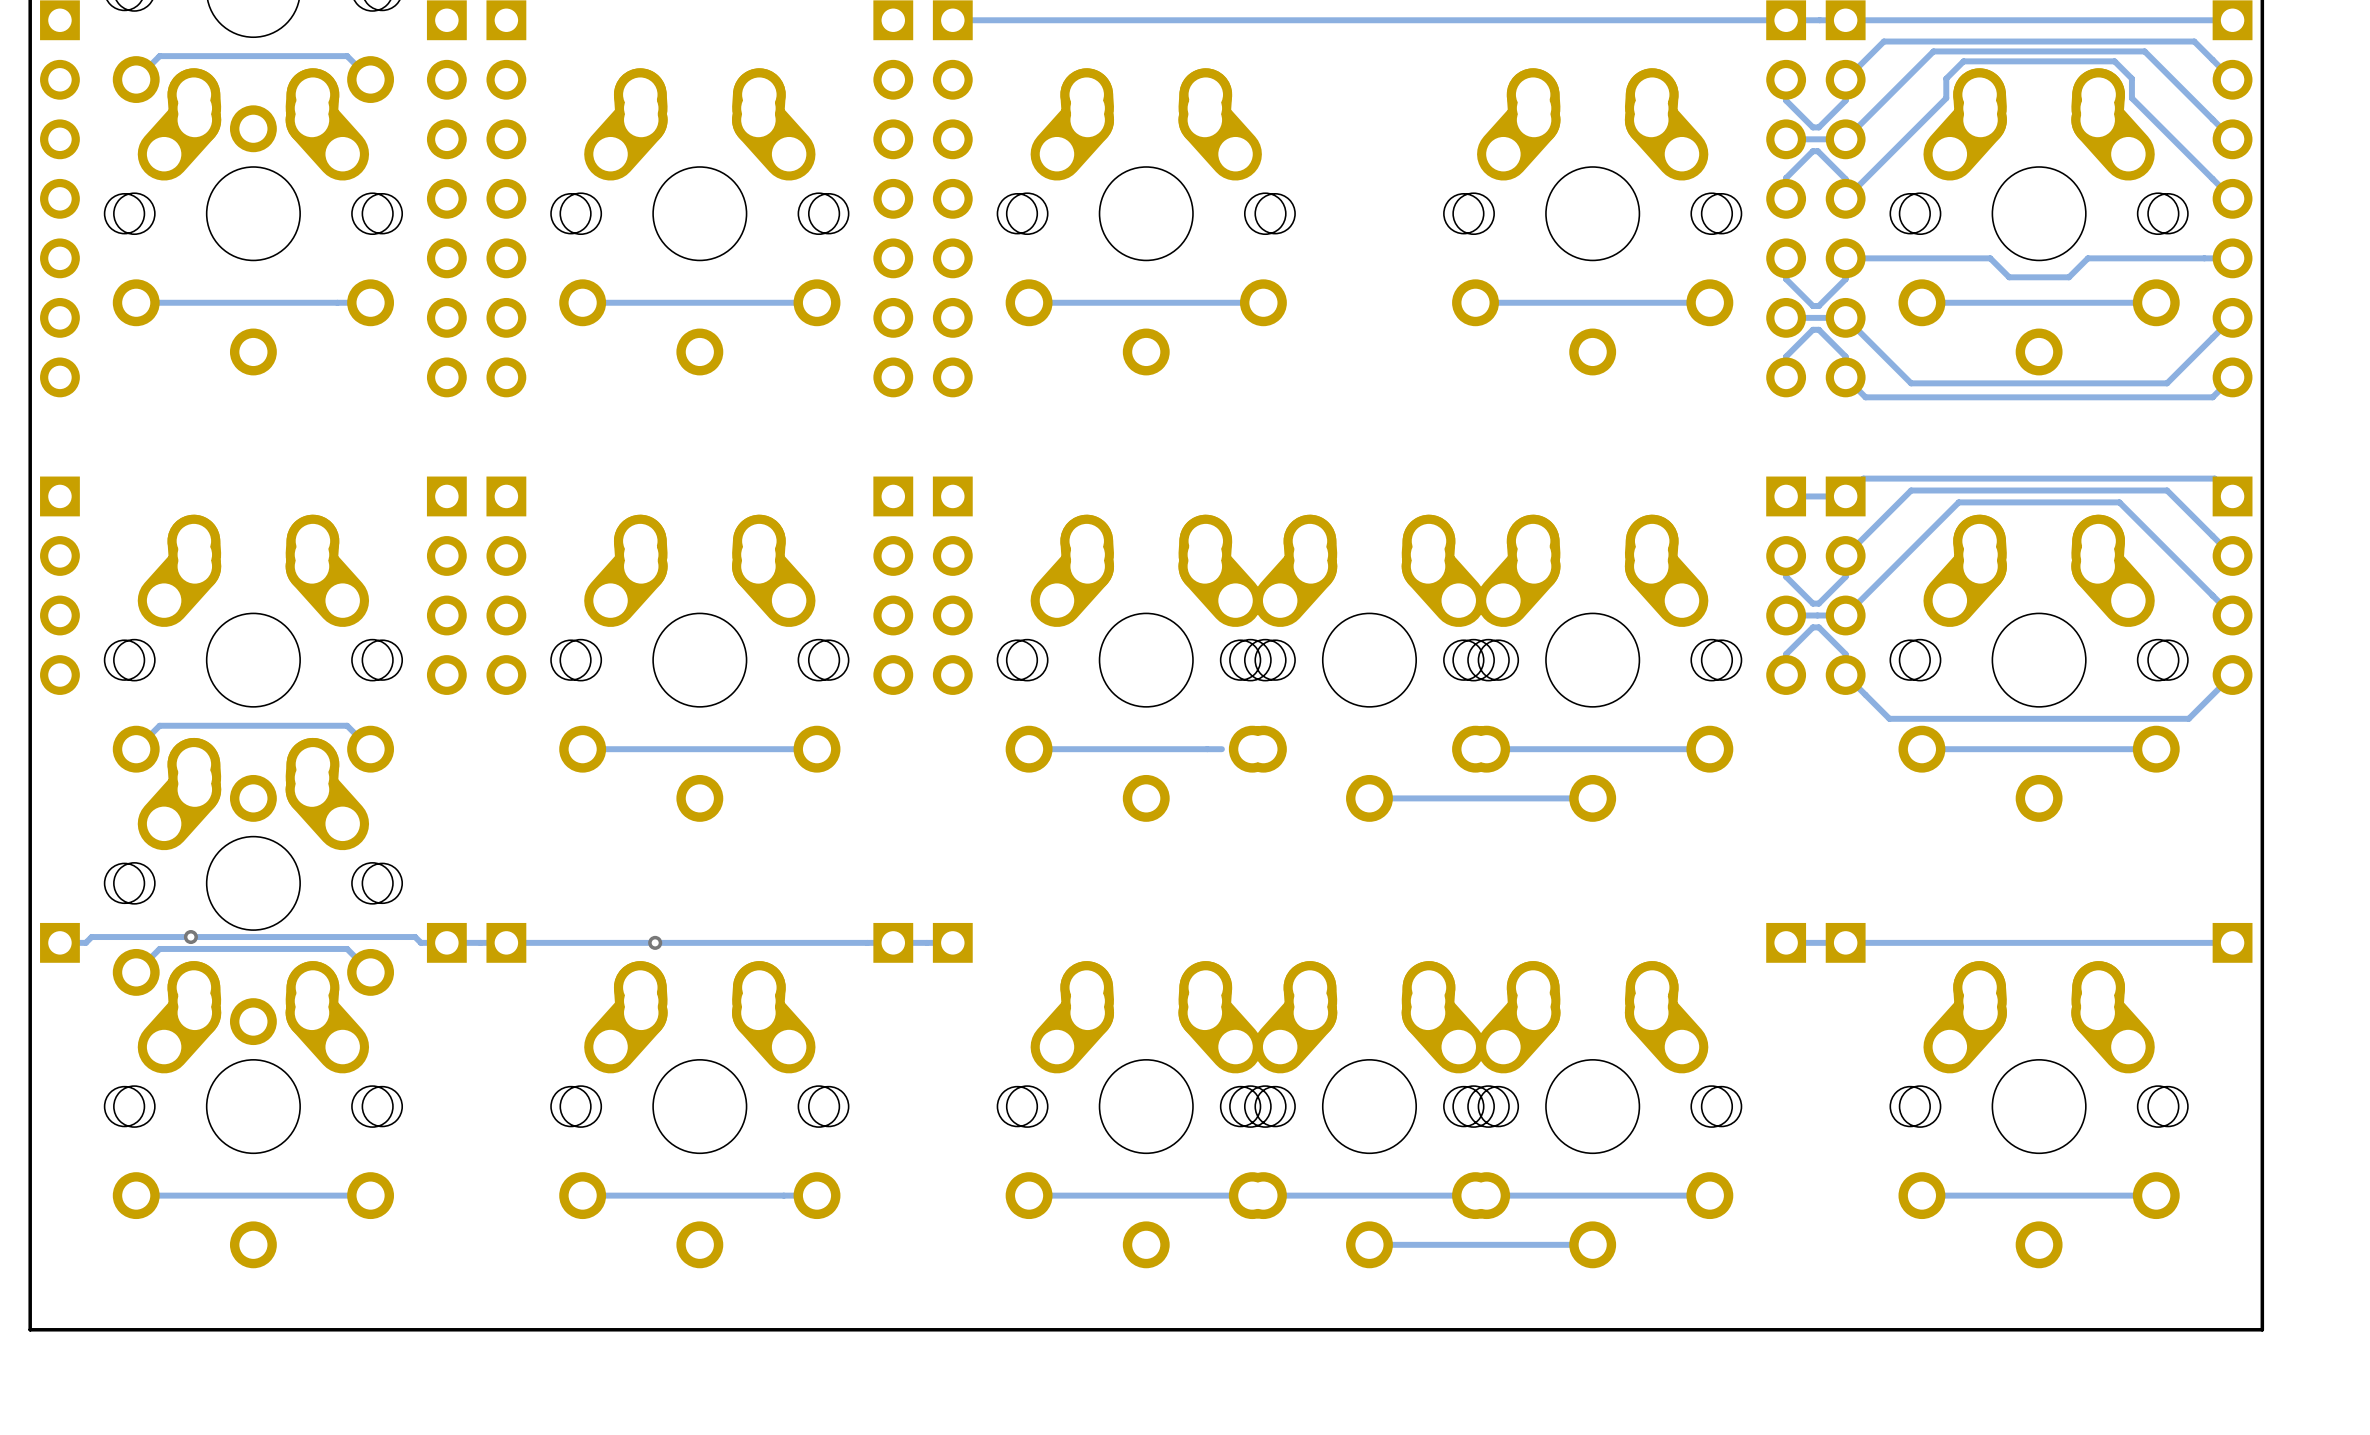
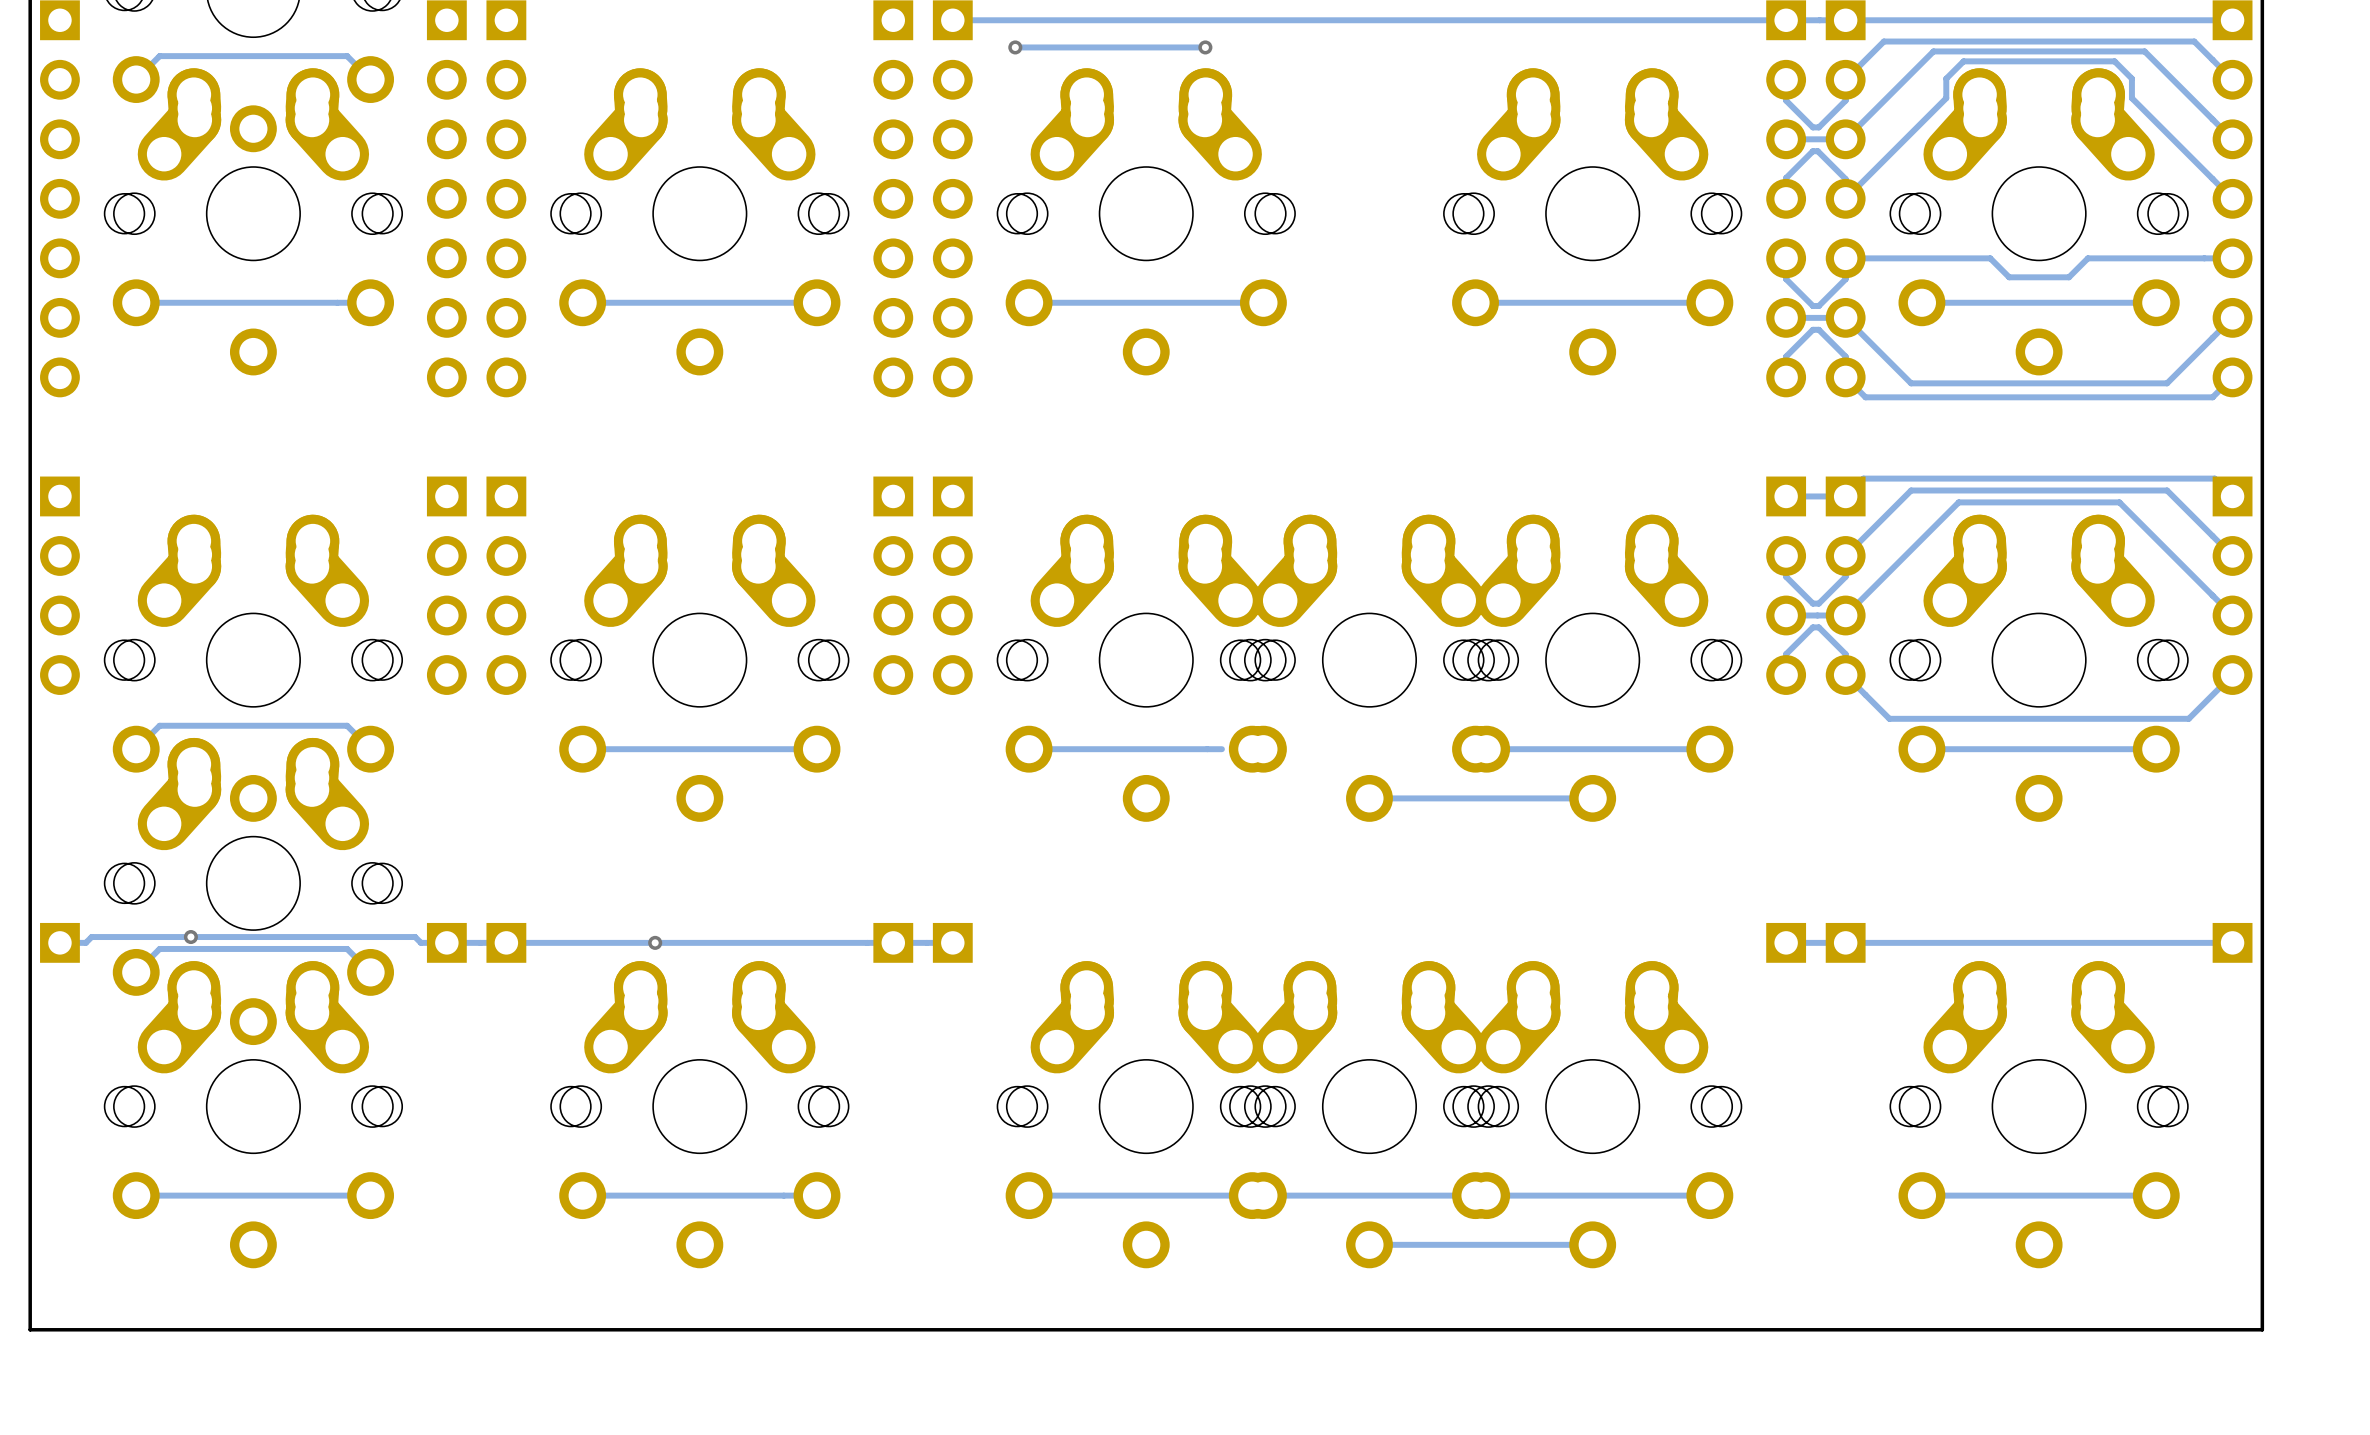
via: none -> (1015, 47)
track: none -> (1205, 47) (1015, 47)
via: none -> (1205, 47)

